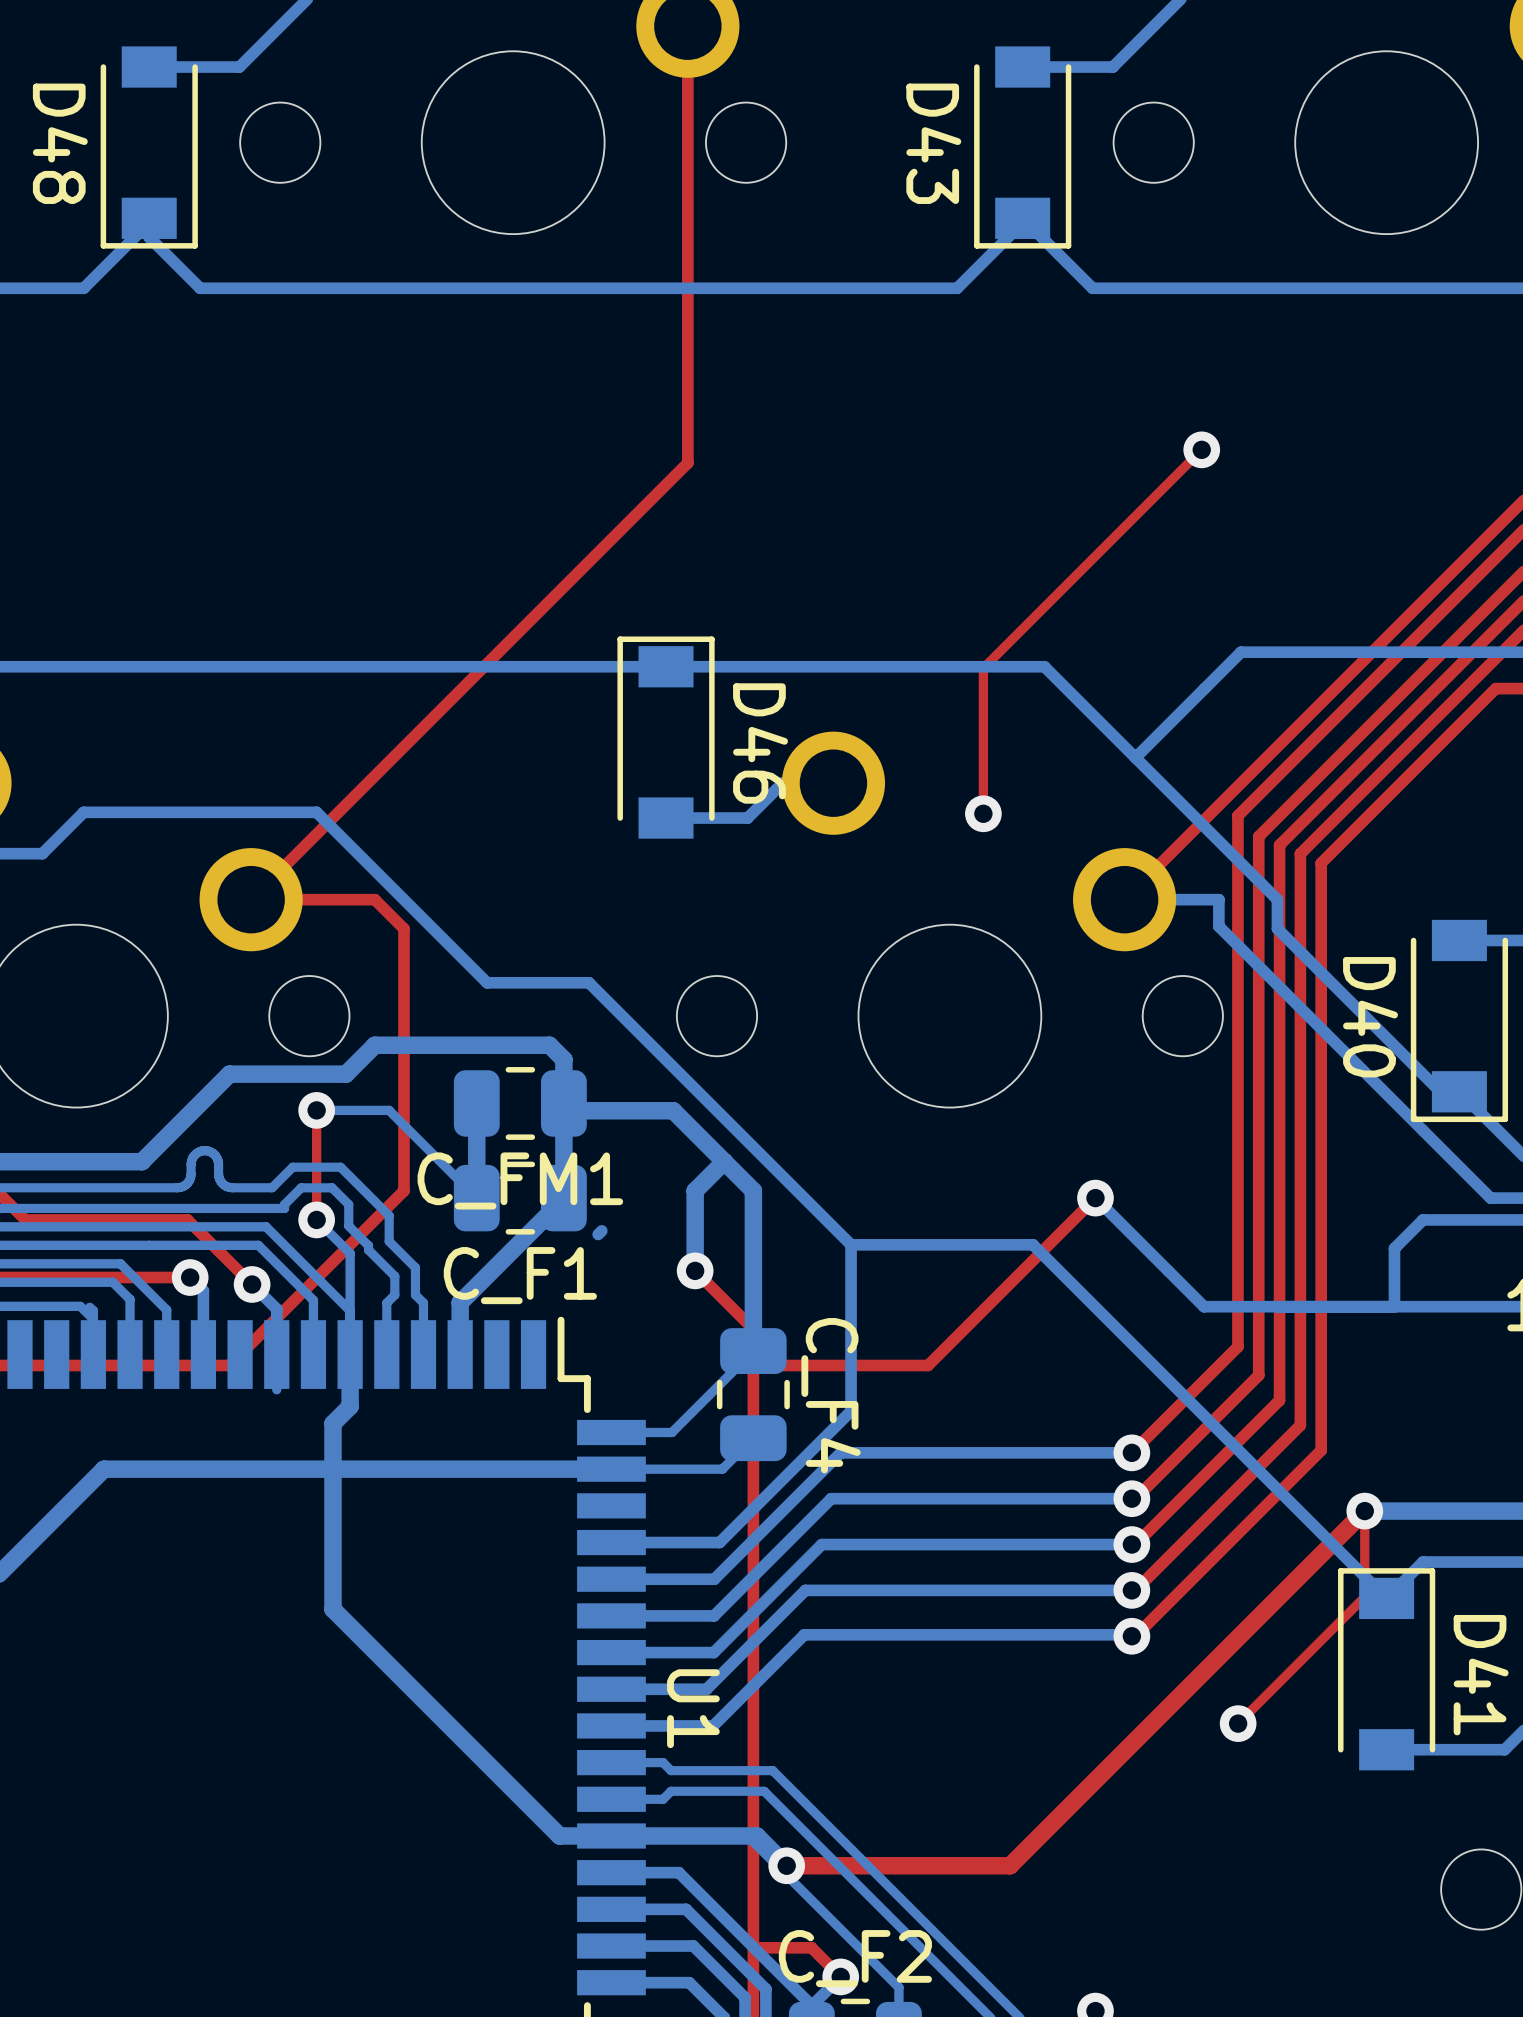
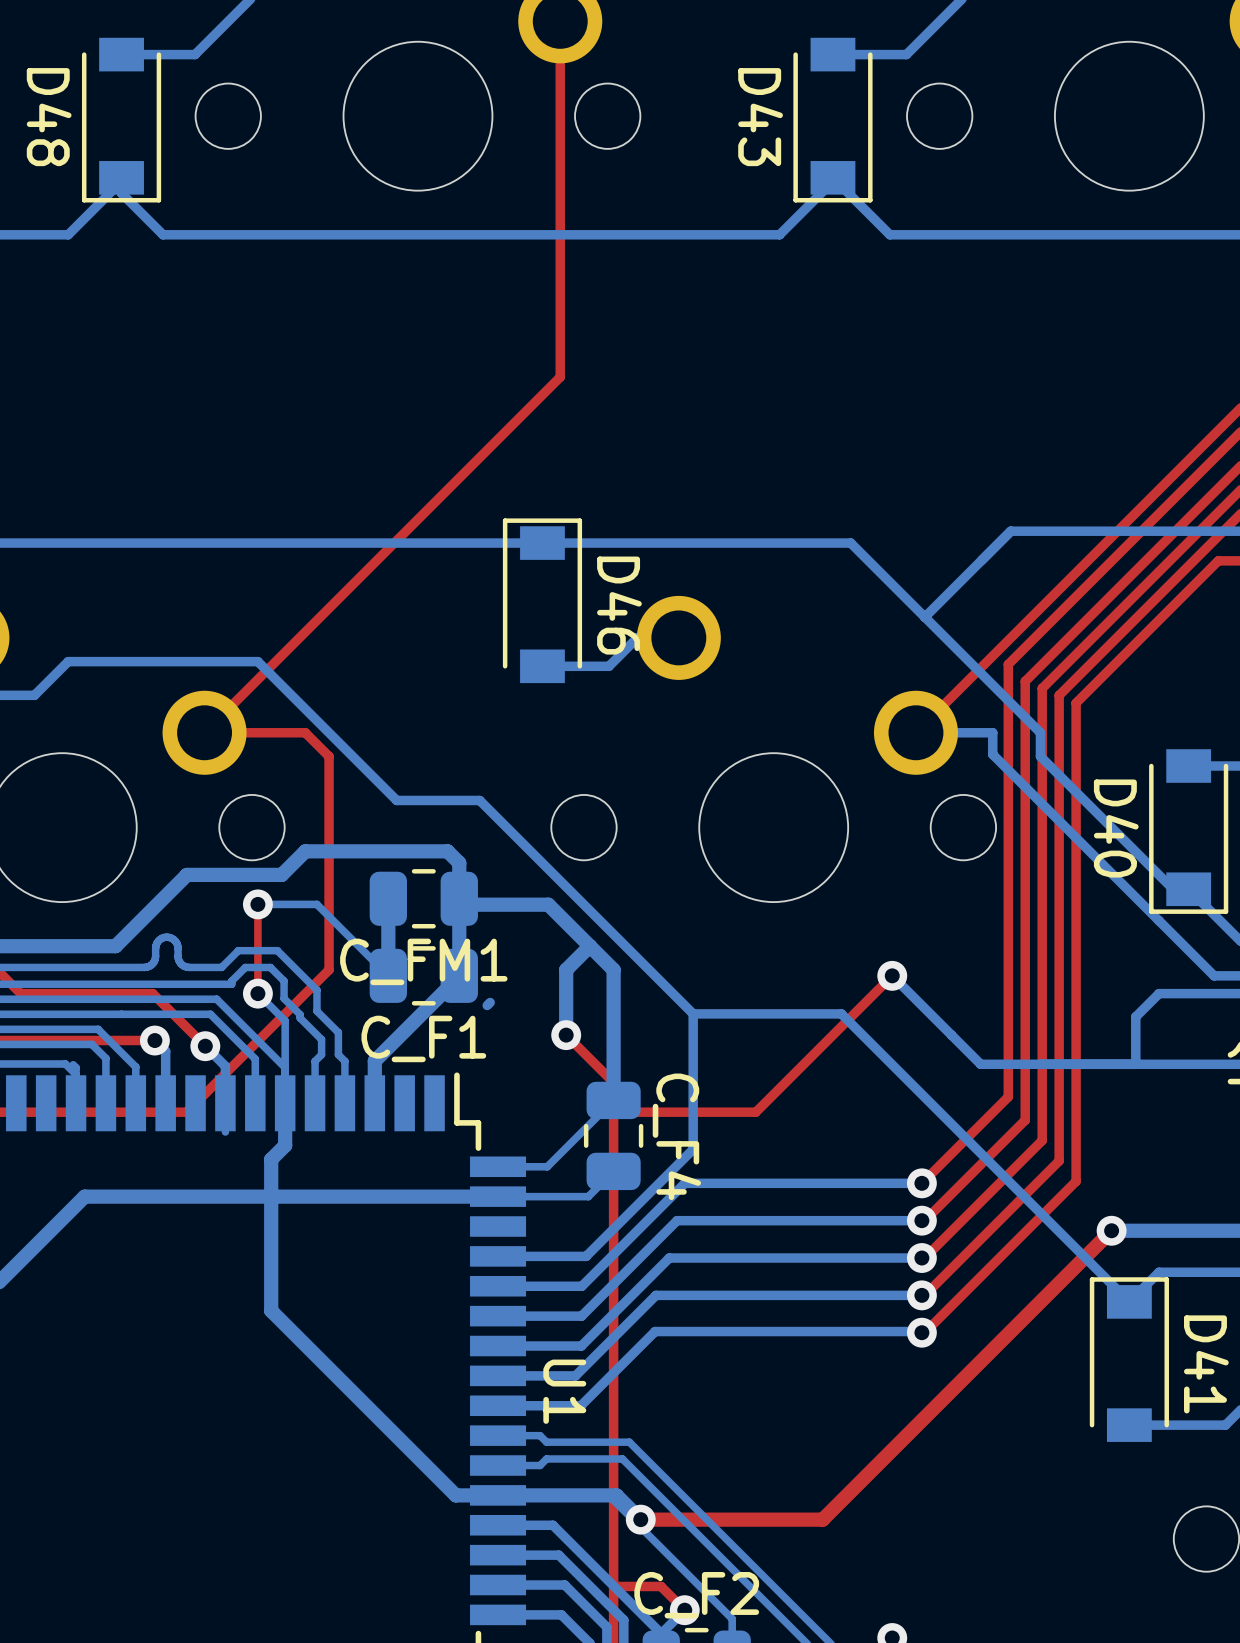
top track: (1201, 449) (983, 668) (983, 813) -> none
via: (1201, 449) -> none
via: (983, 813) -> none
top track: (1364, 1511) (1364, 1596) (1238, 1723) -> none
via: (1238, 1723) -> none

